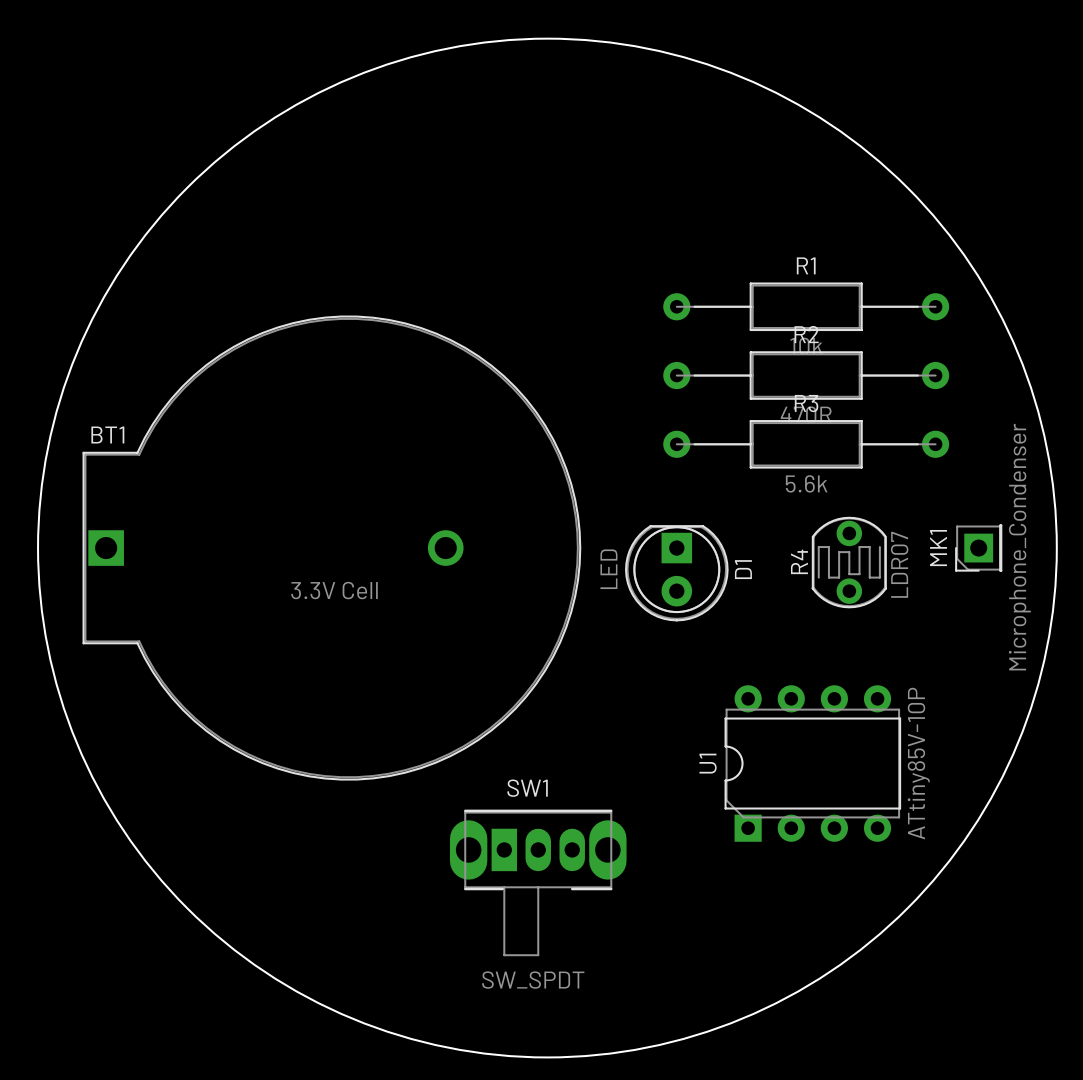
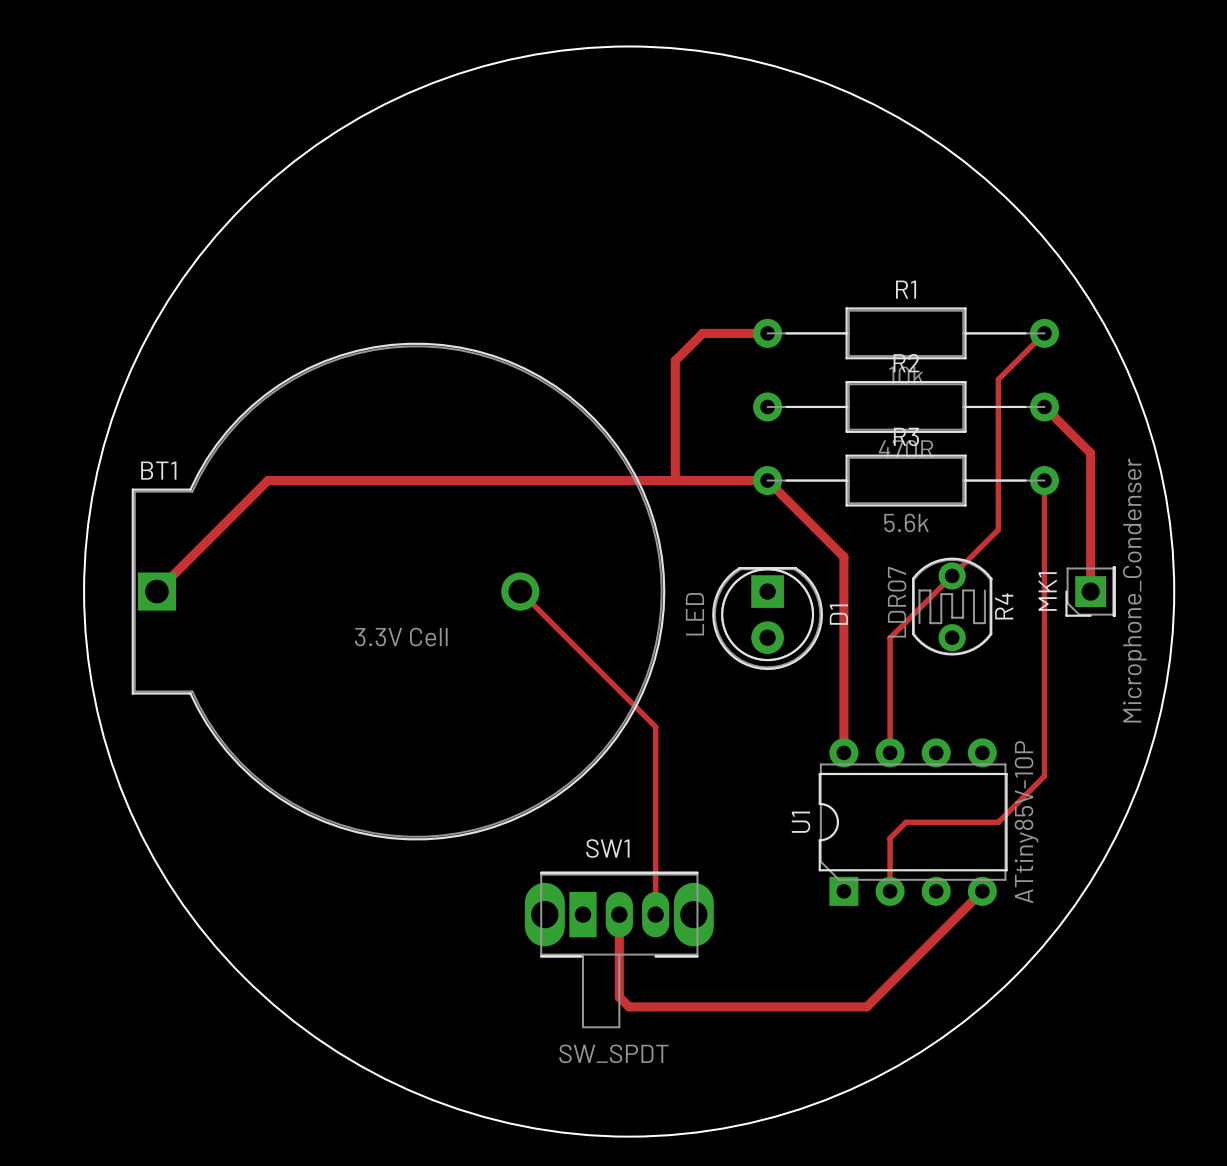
track: none -> (767, 333) (702, 333) (675, 360) (675, 480)
track: none -> (1044, 333) (998, 379) (998, 529) (890, 638) (890, 752)
track: none -> (1044, 406) (1090, 453) (1090, 591)
track: none -> (1044, 480) (1044, 776) (998, 822) (906, 822) (890, 838) (890, 891)
track: none -> (156, 591) (267, 480) (767, 480) (843, 556) (843, 752)
track: none -> (520, 591) (655, 726) (655, 914)
R4 rotation: 0° (849, 562) -> 180° (952, 606)
track: none -> (982, 891) (866, 1006) (629, 1006) (619, 997) (619, 914)

